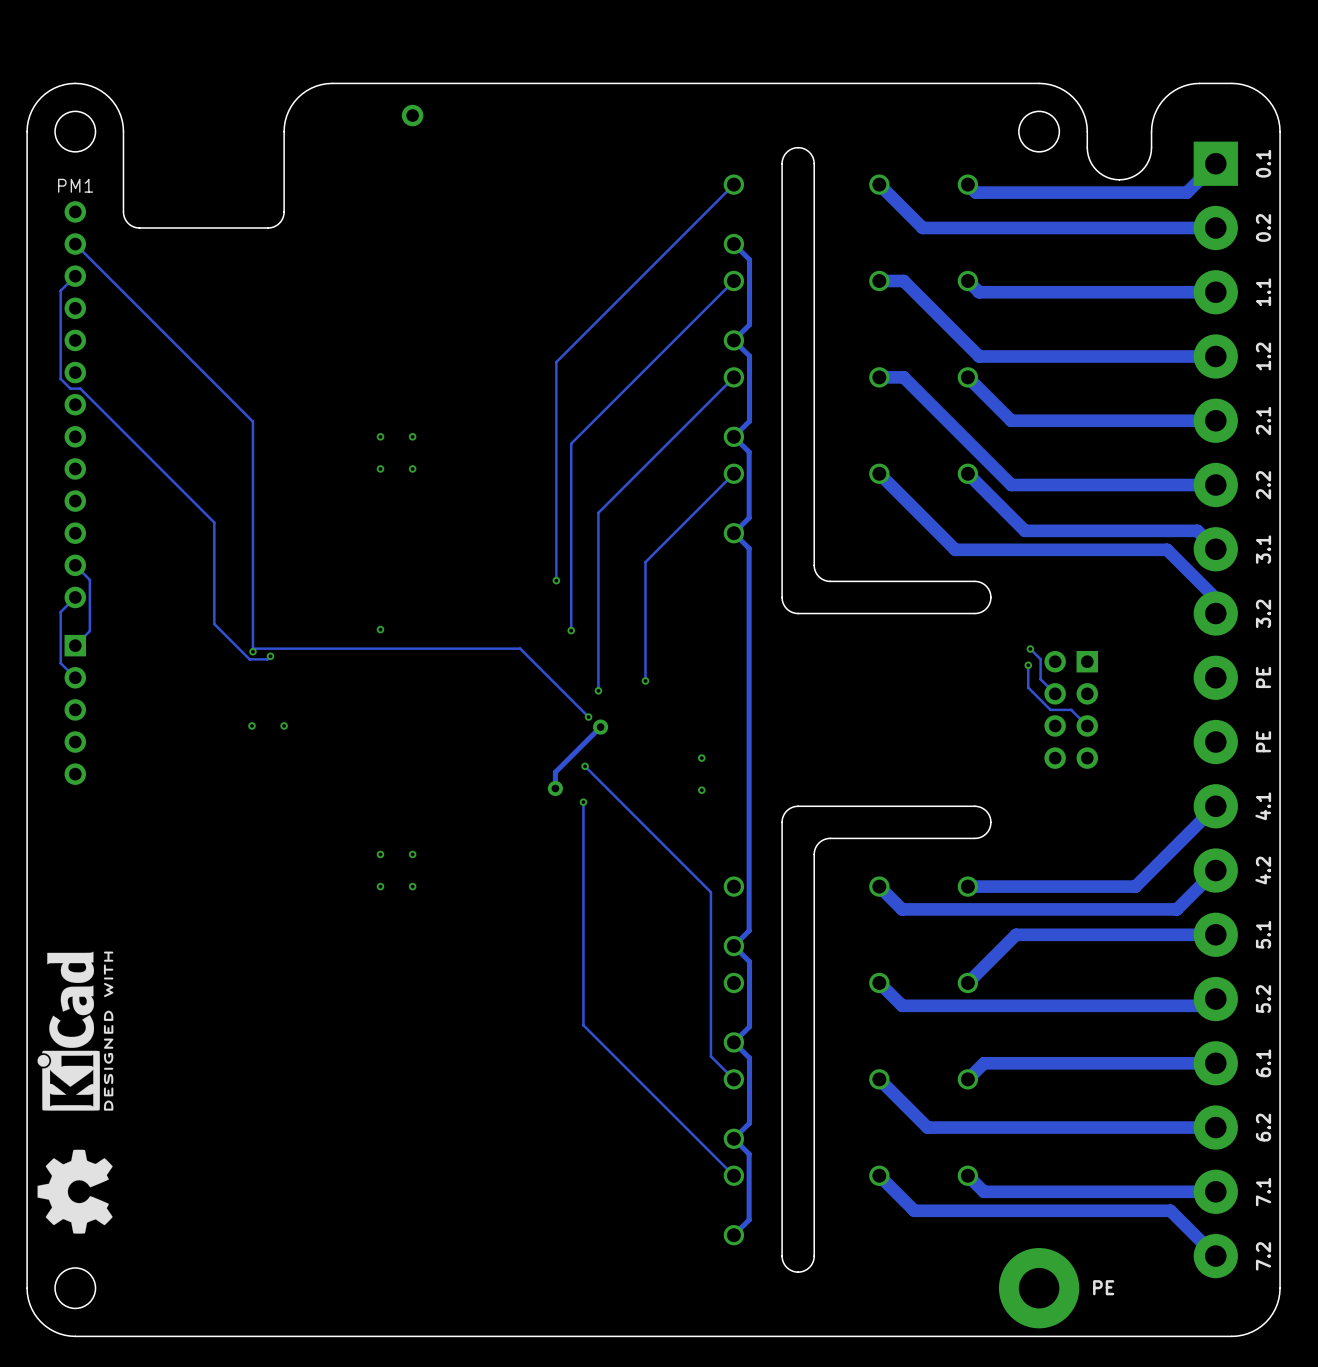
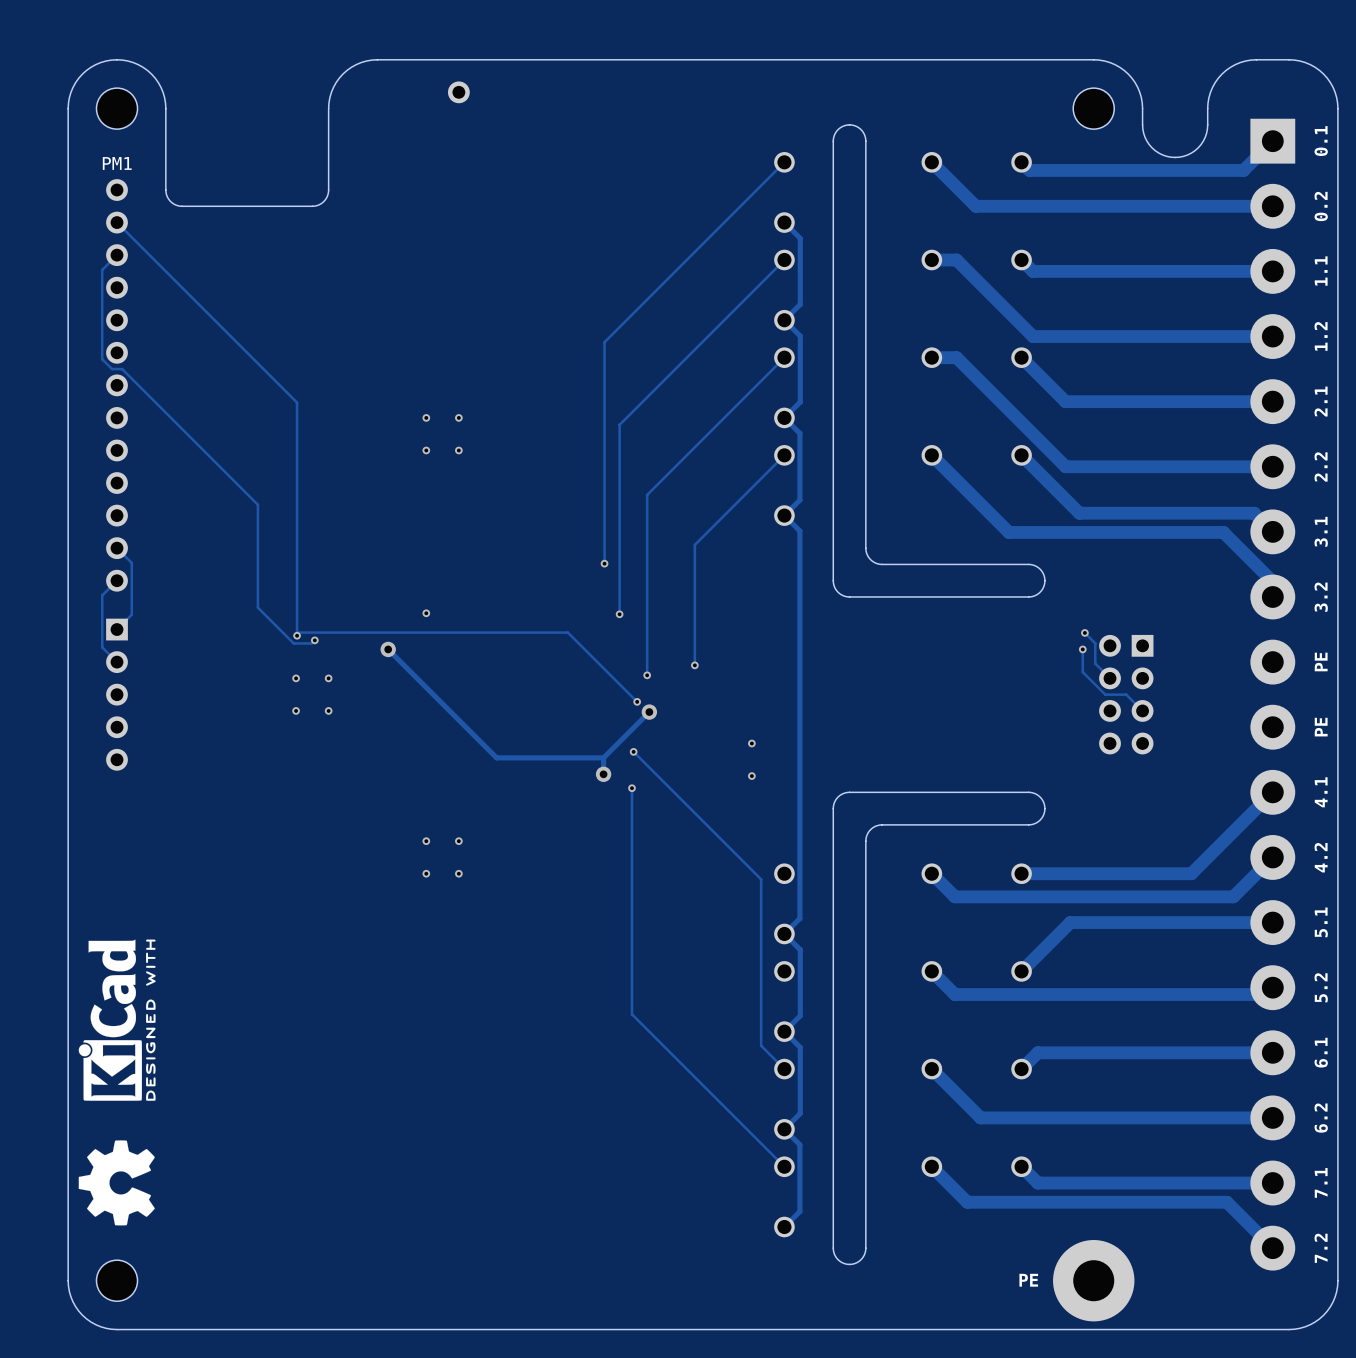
track: none -> (388, 649) (496, 757) (603, 757)
via: none -> (388, 649)
via: none -> (296, 678)
via: none -> (328, 678)
text position: PE (1103, 1287) -> PE (1028, 1280)

